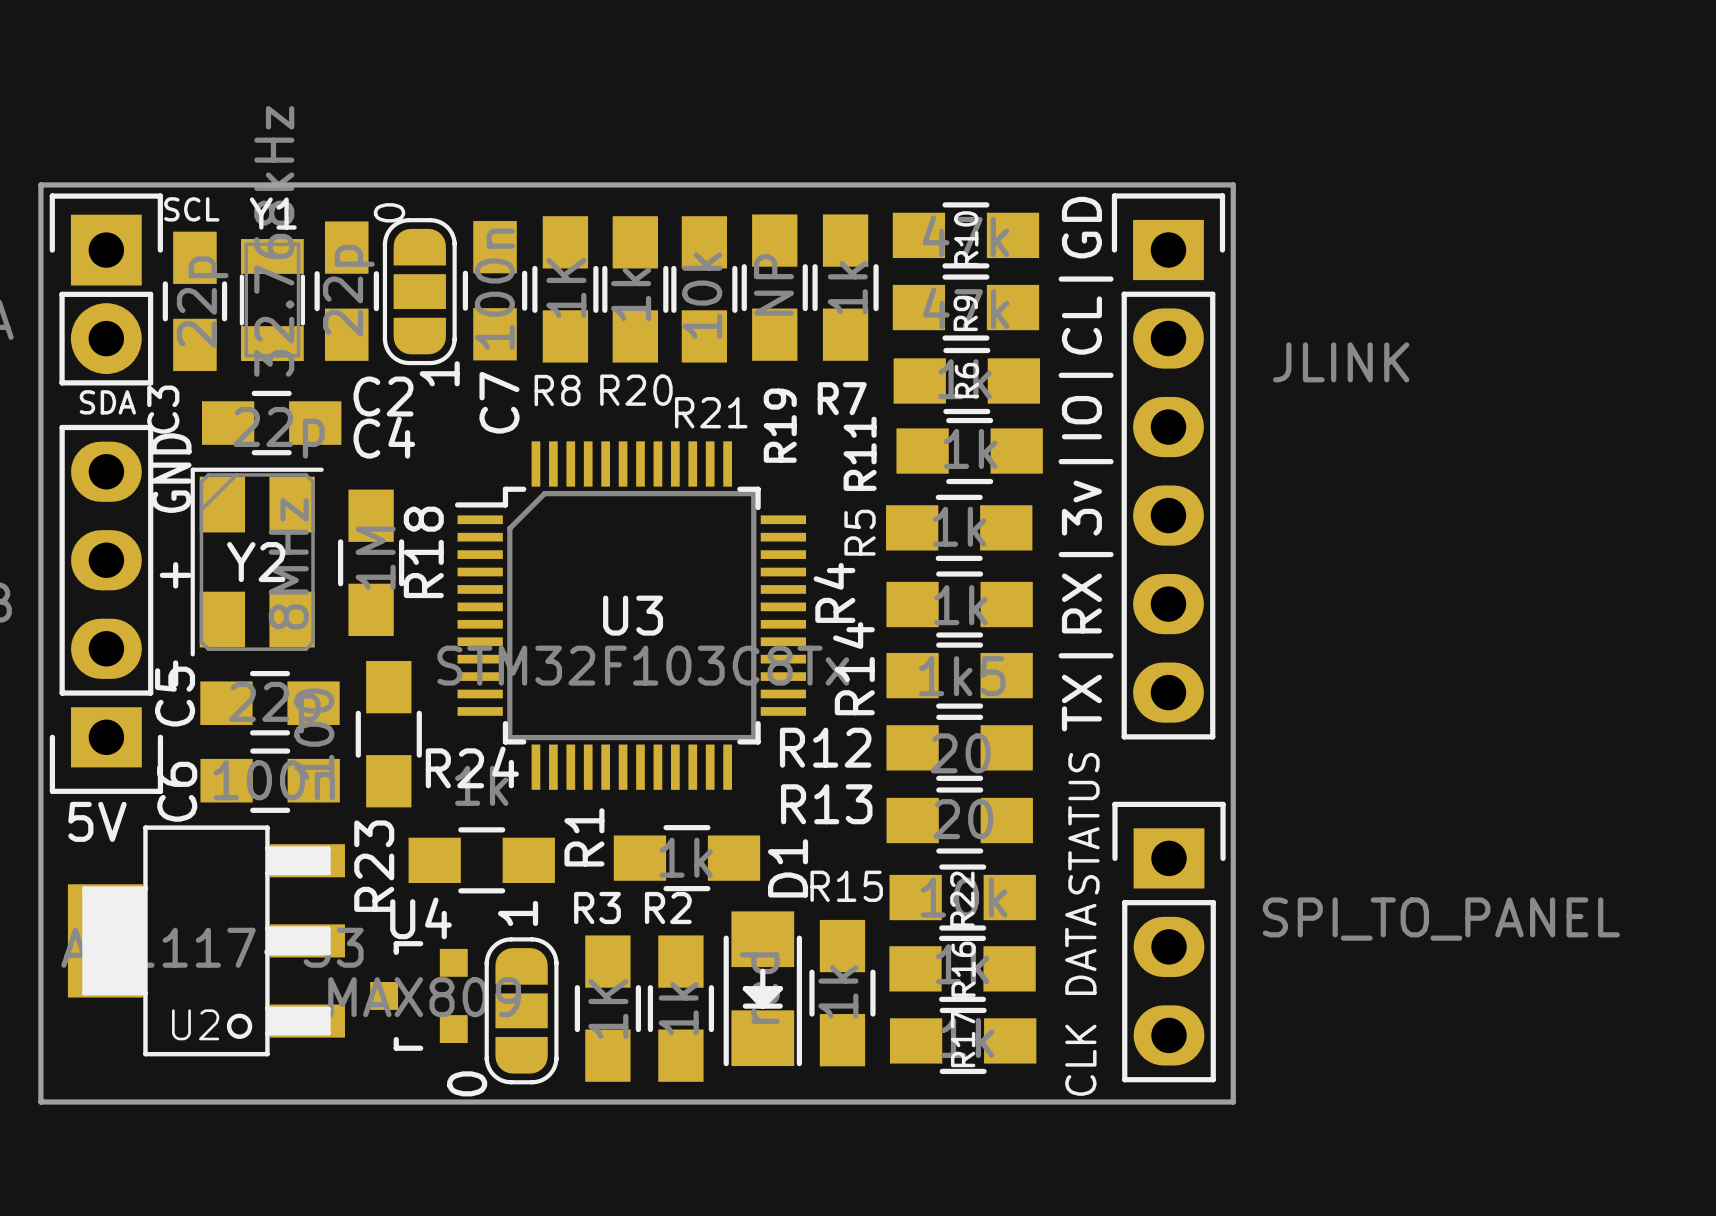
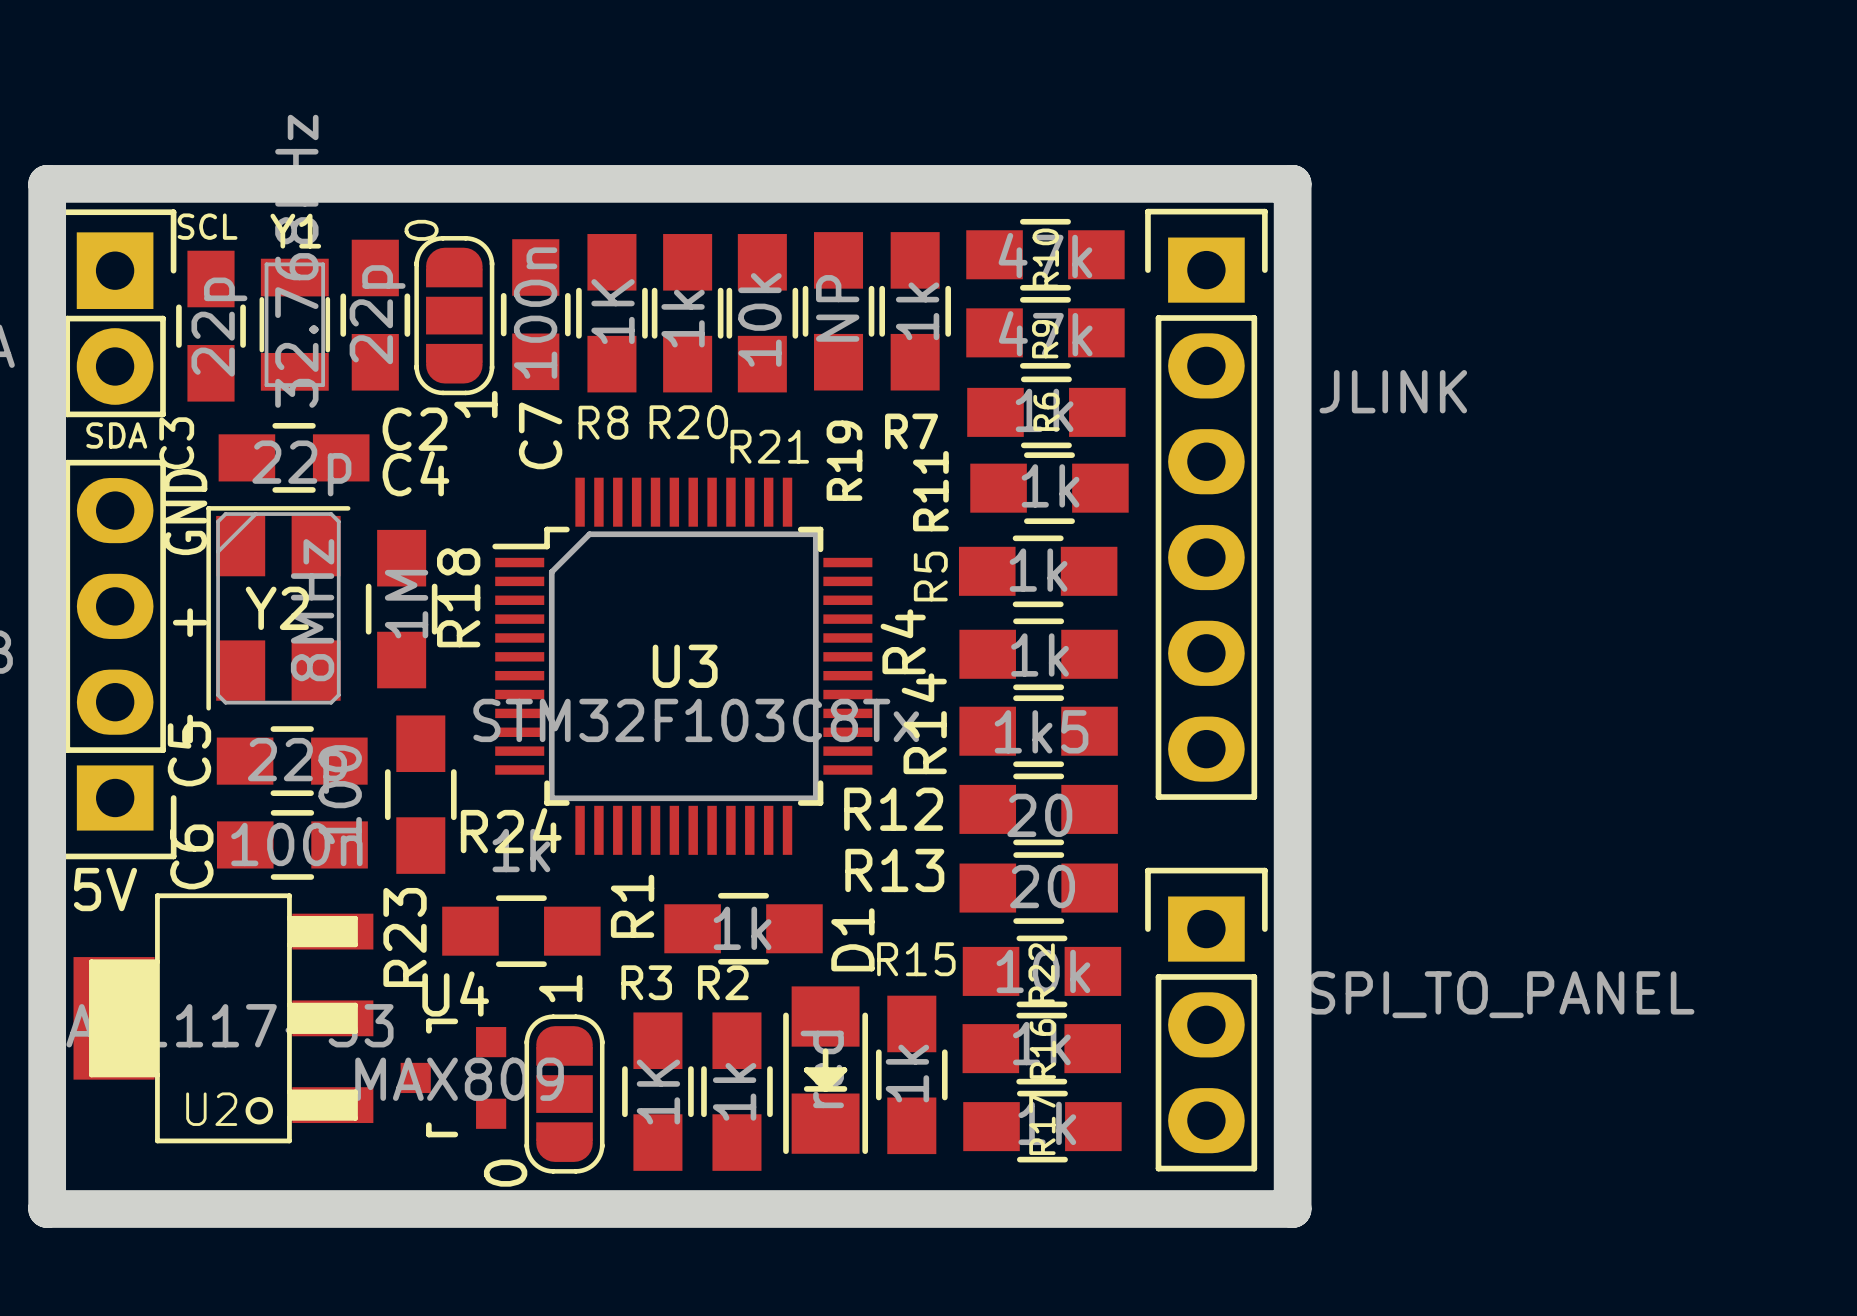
board edge: (40, 184) (40, 1102) (1233, 1102) (1233, 184) (40, 184) -> (47, 183) (47, 1209) (1292, 1209) (1292, 183) (47, 183)
text: TX|RX|3v|IO|CL|GD (1086, 464) -> none
part position: (1168, 466) -> (1206, 504)
text: STATUS (1083, 823) -> none
part position: (1169, 942) -> (1206, 1019)
text: CLK DATA (1080, 999) -> none

